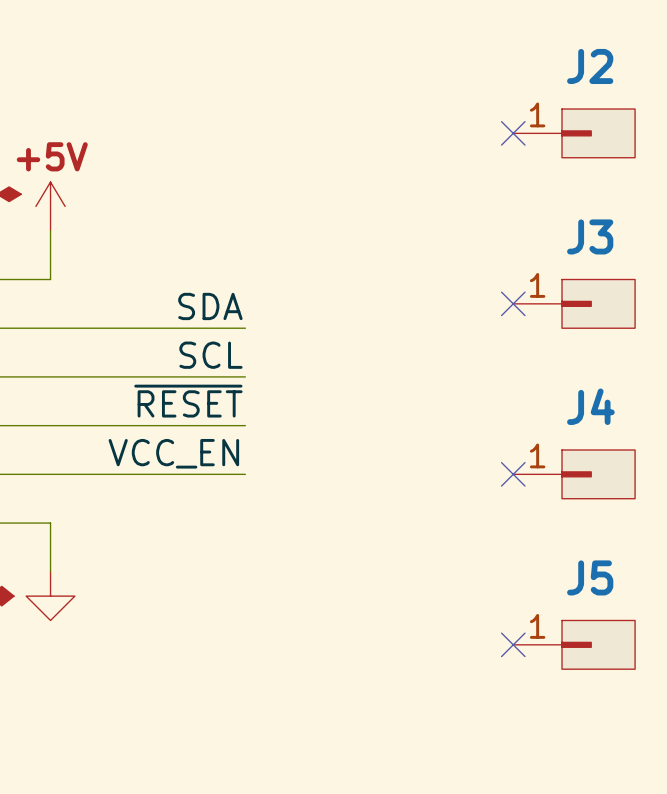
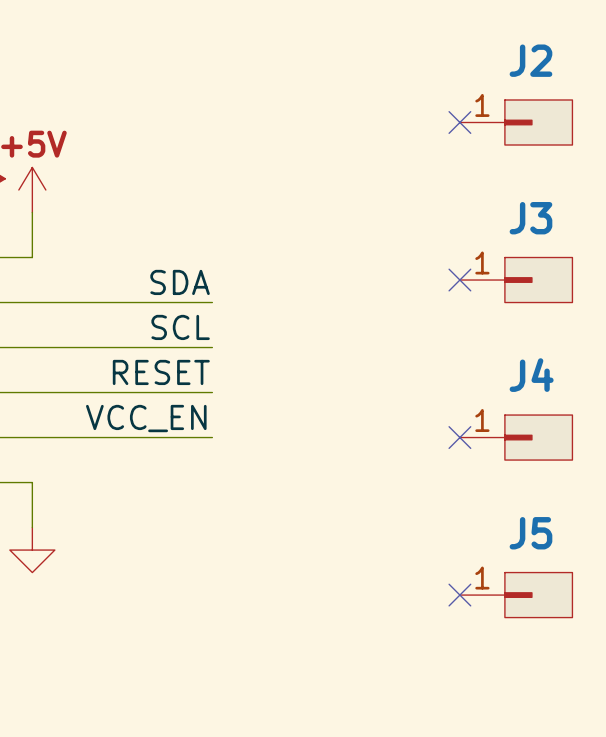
label: ~{RESET} (188, 401) -> RESET (161, 372)

